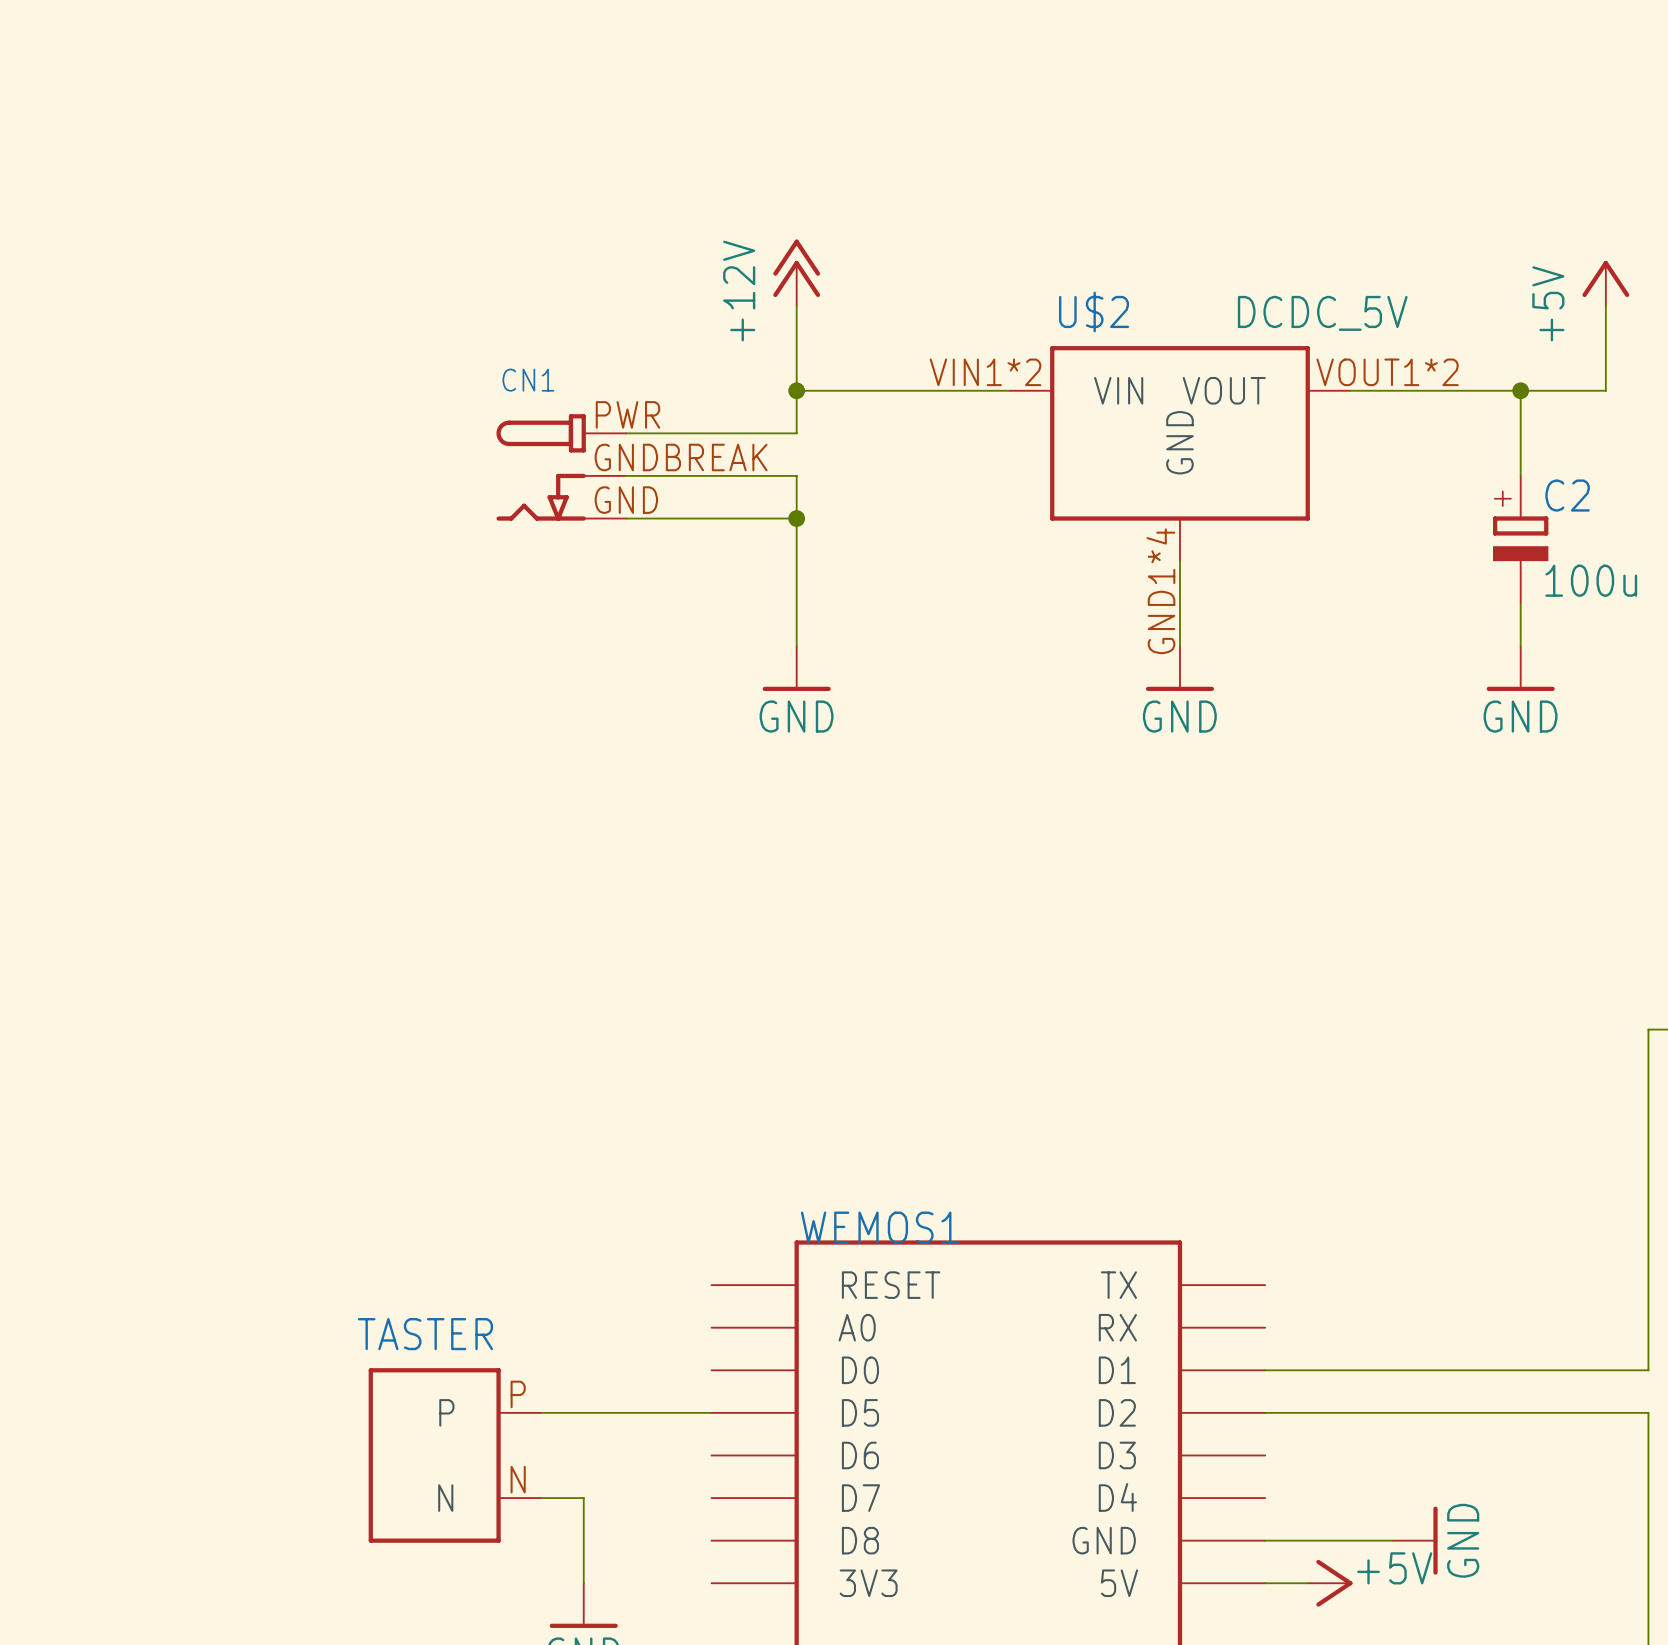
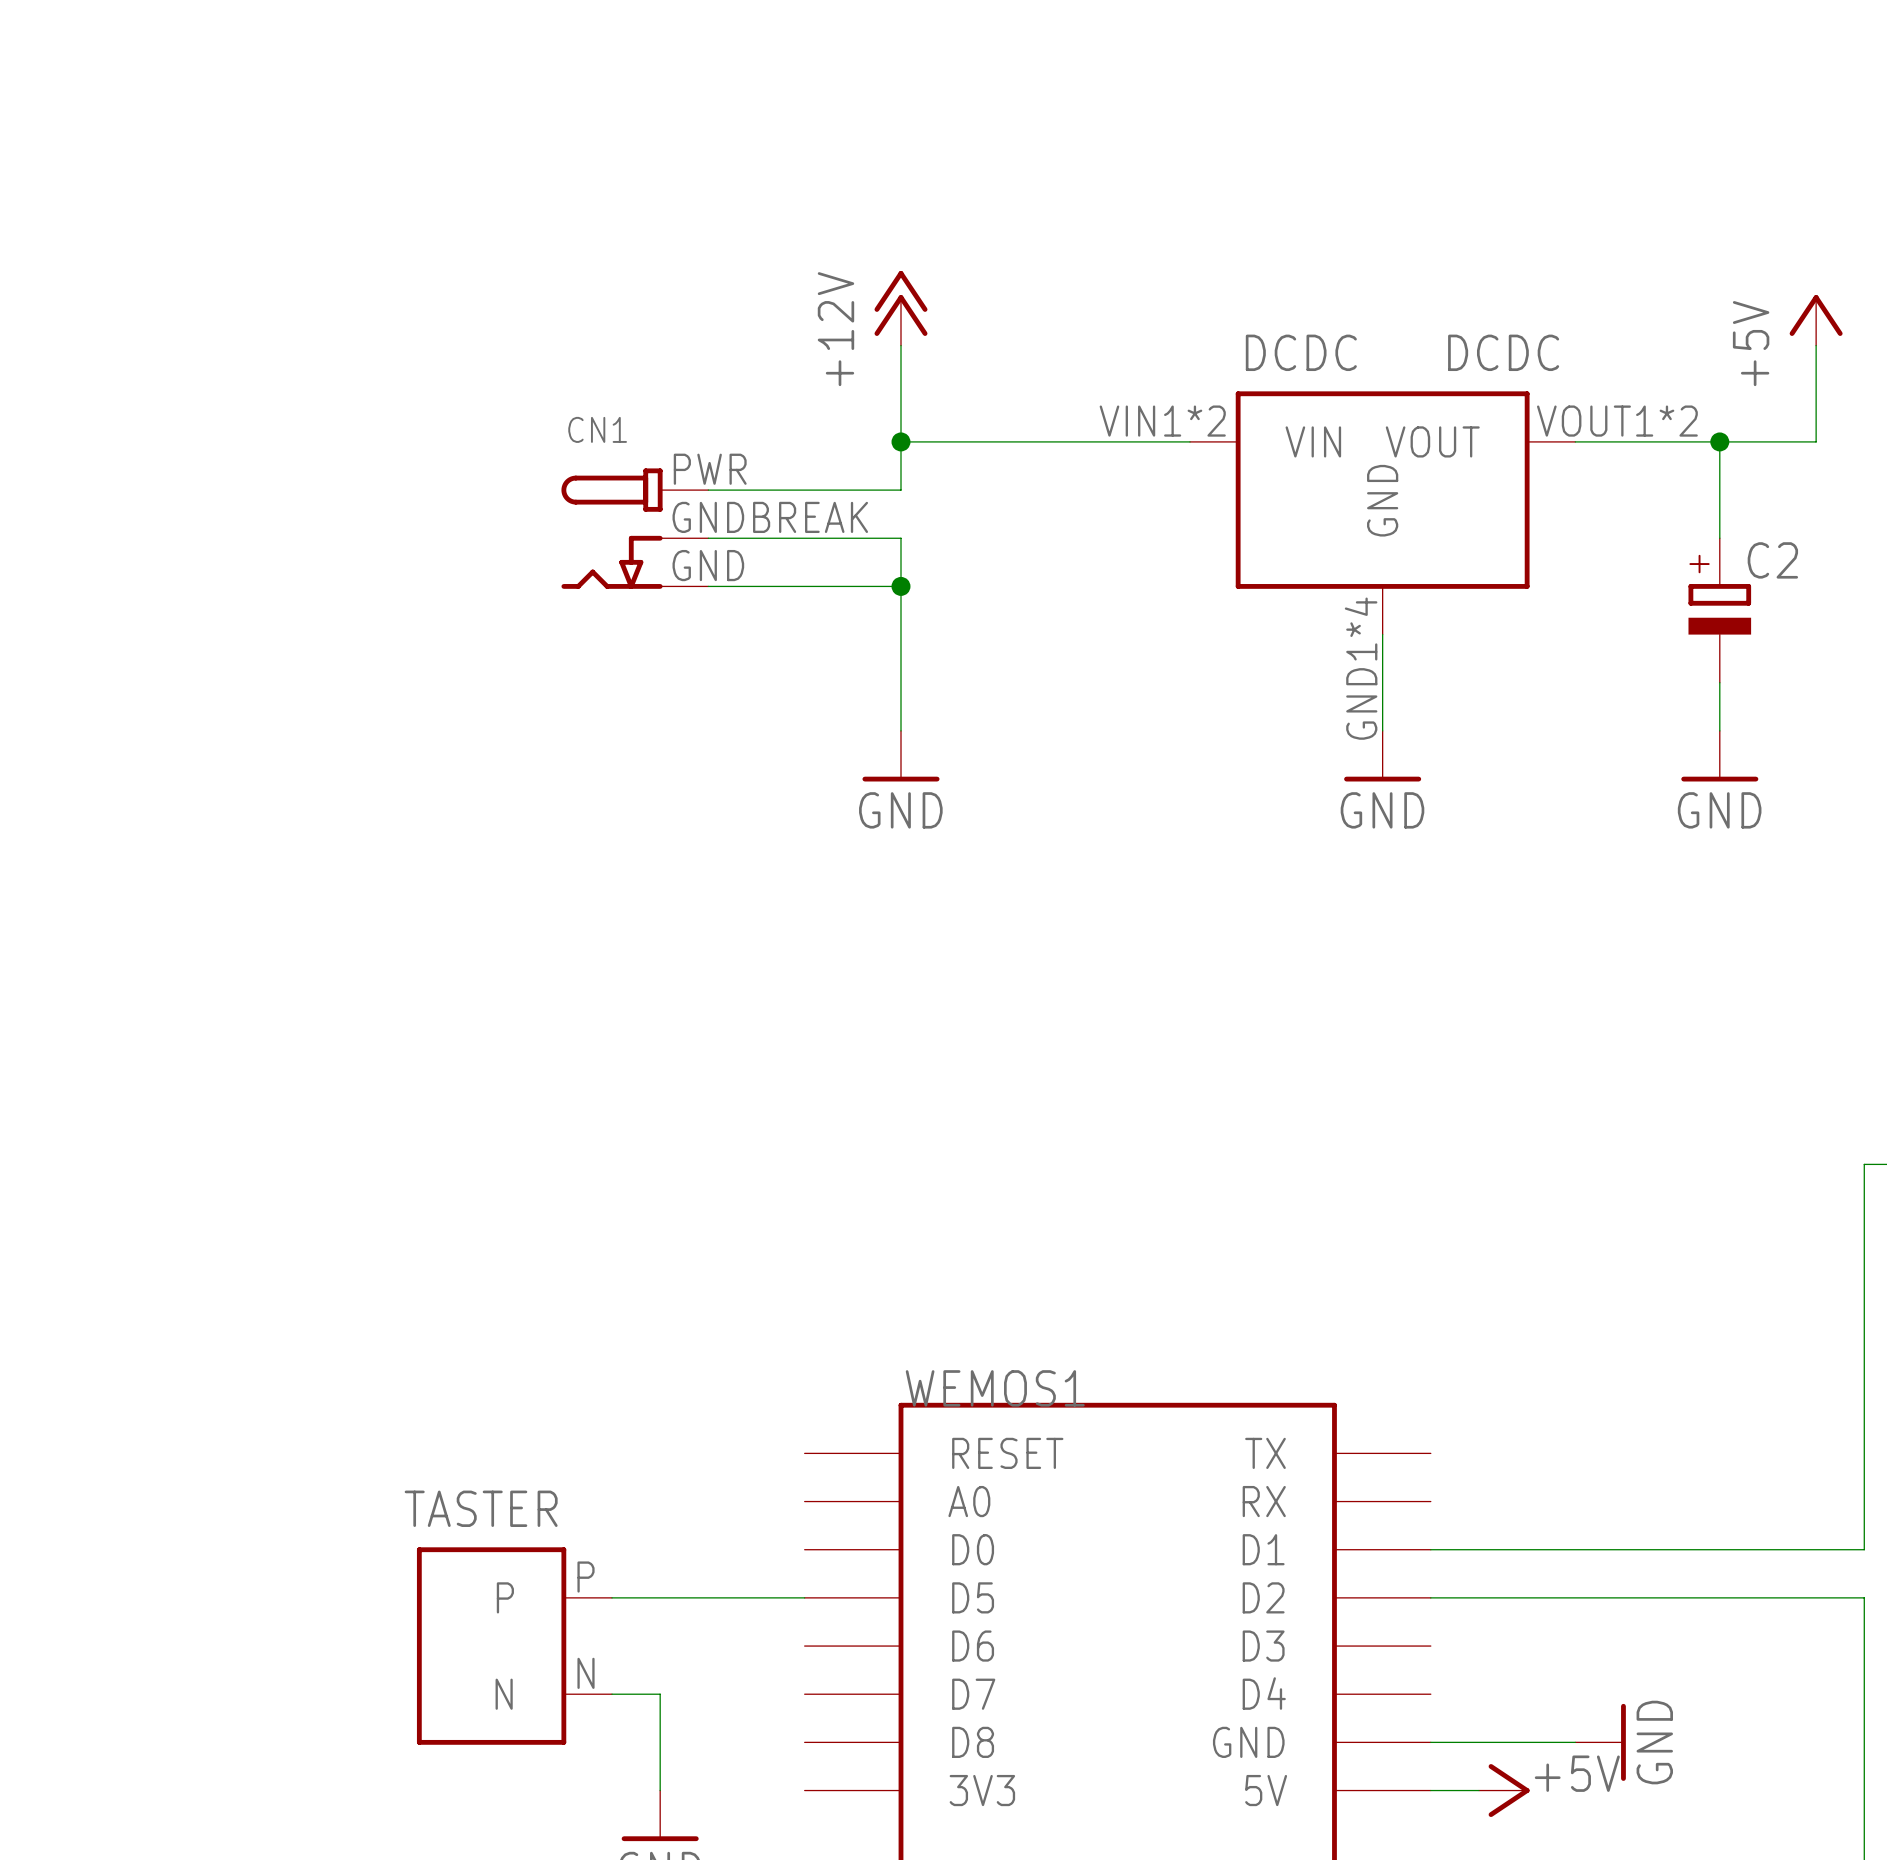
U$2: DCDC_5V (1179, 453) -> none
DCDC: none -> DCDC (1382, 512)
wire: (1179, 561) (1179, 646) -> (1382, 634) (1382, 730)
C2 value: 100u (1591, 580) -> none
power symbol position: GND (1179, 668) -> GND (1382, 756)

